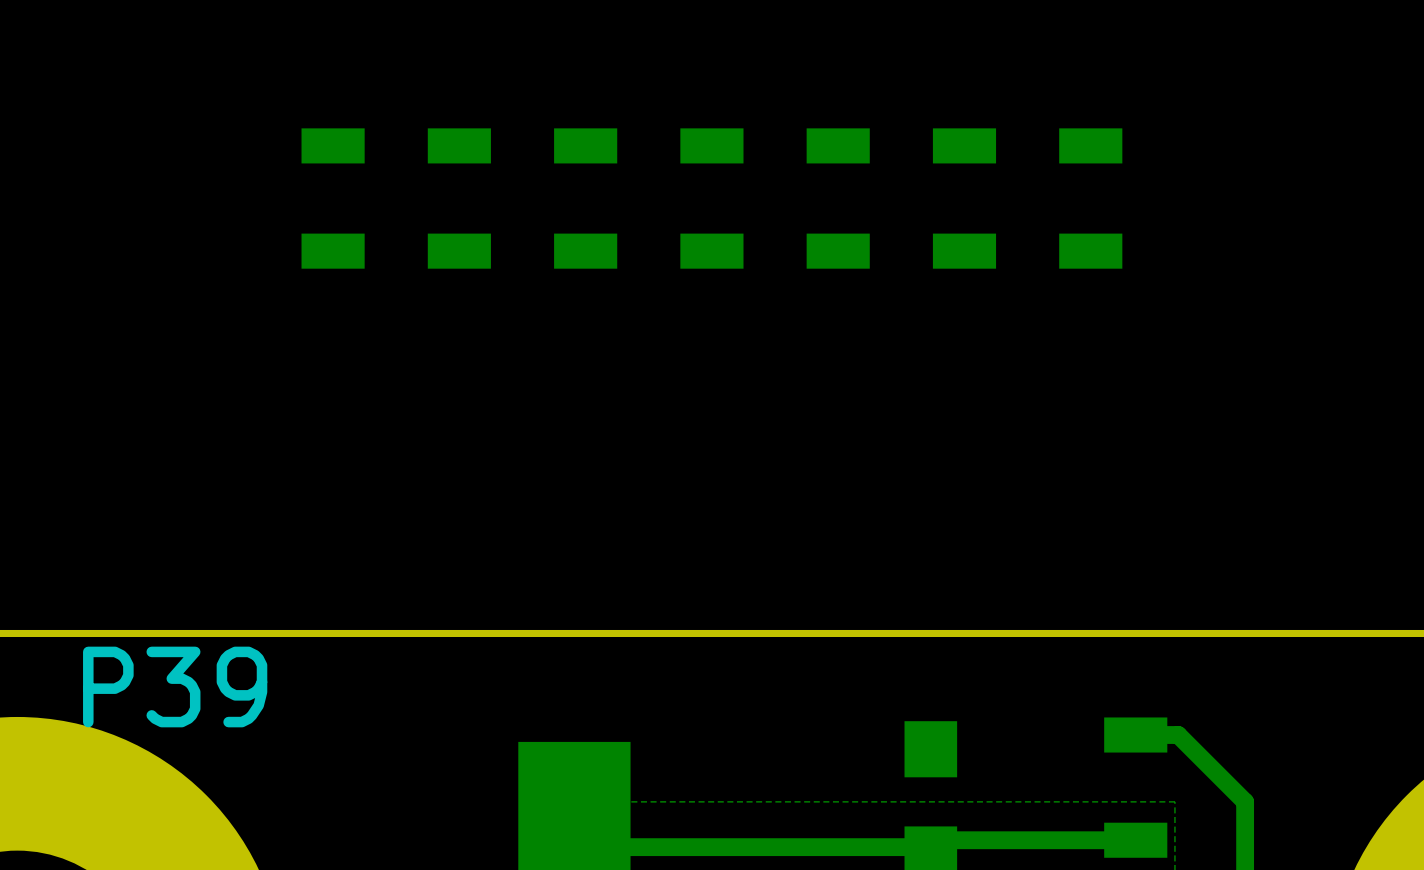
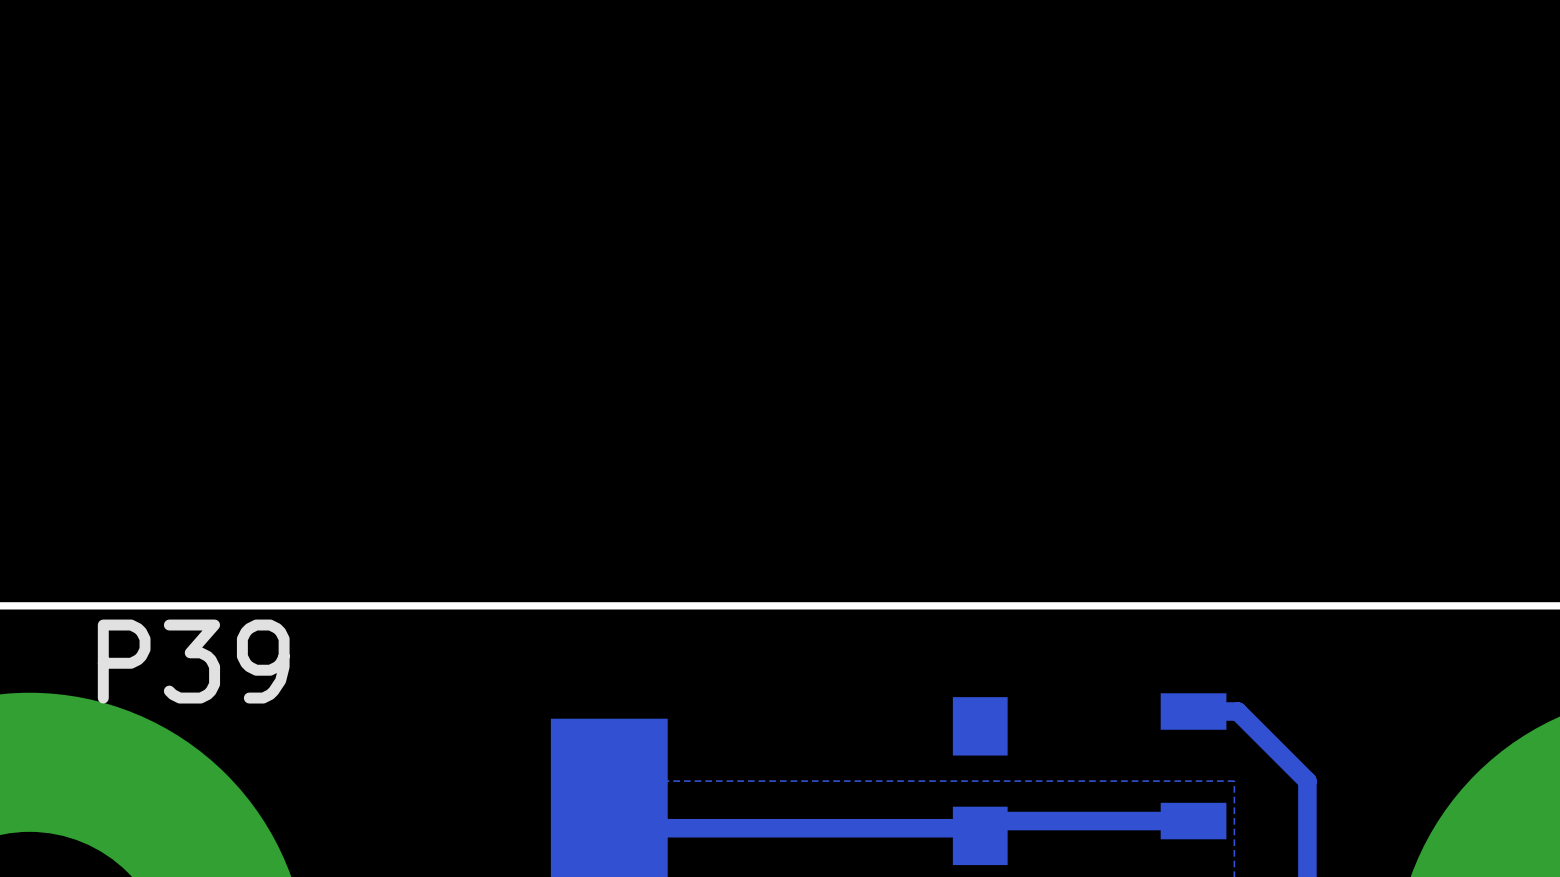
part: (333, 198) -> none
part: (459, 198) -> none
part: (585, 198) -> none
part: (711, 198) -> none
part: (838, 198) -> none
part: (964, 198) -> none
part: (1090, 198) -> none

